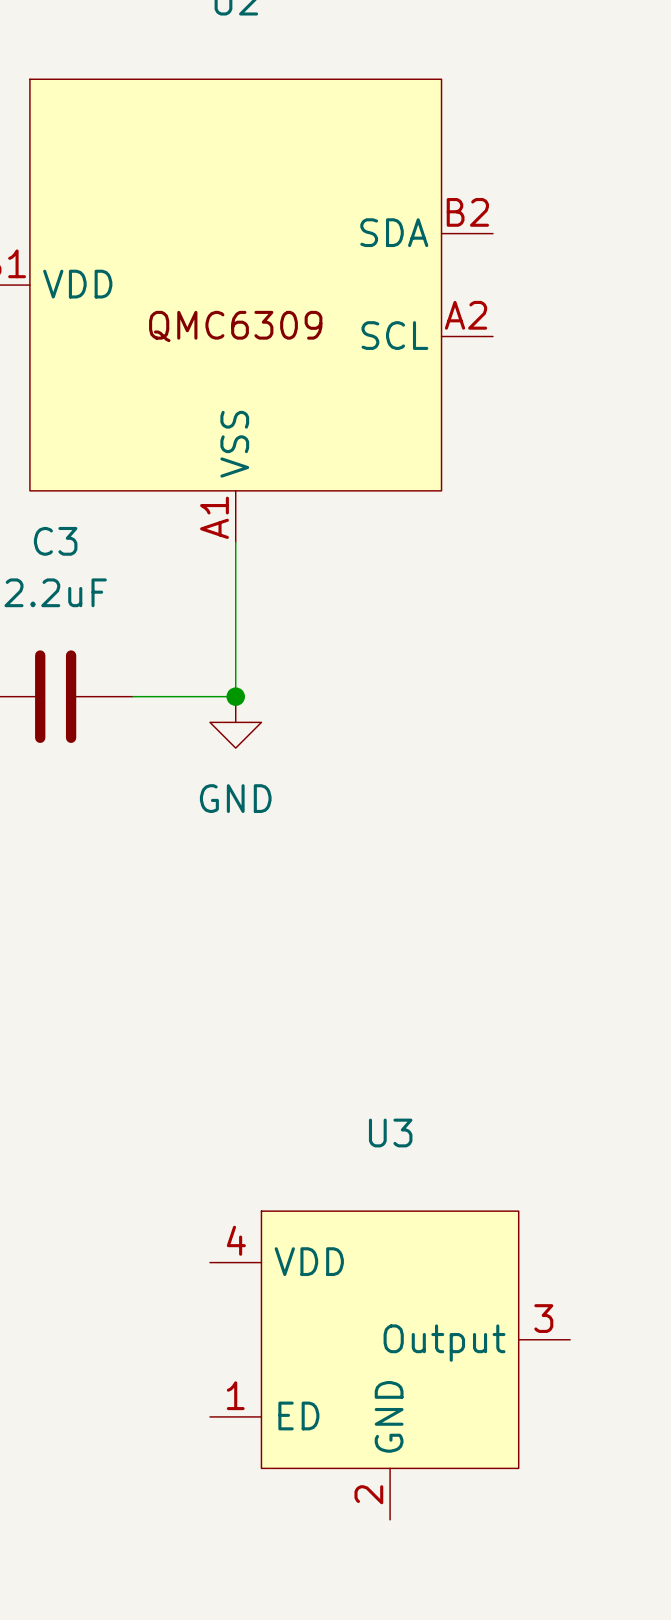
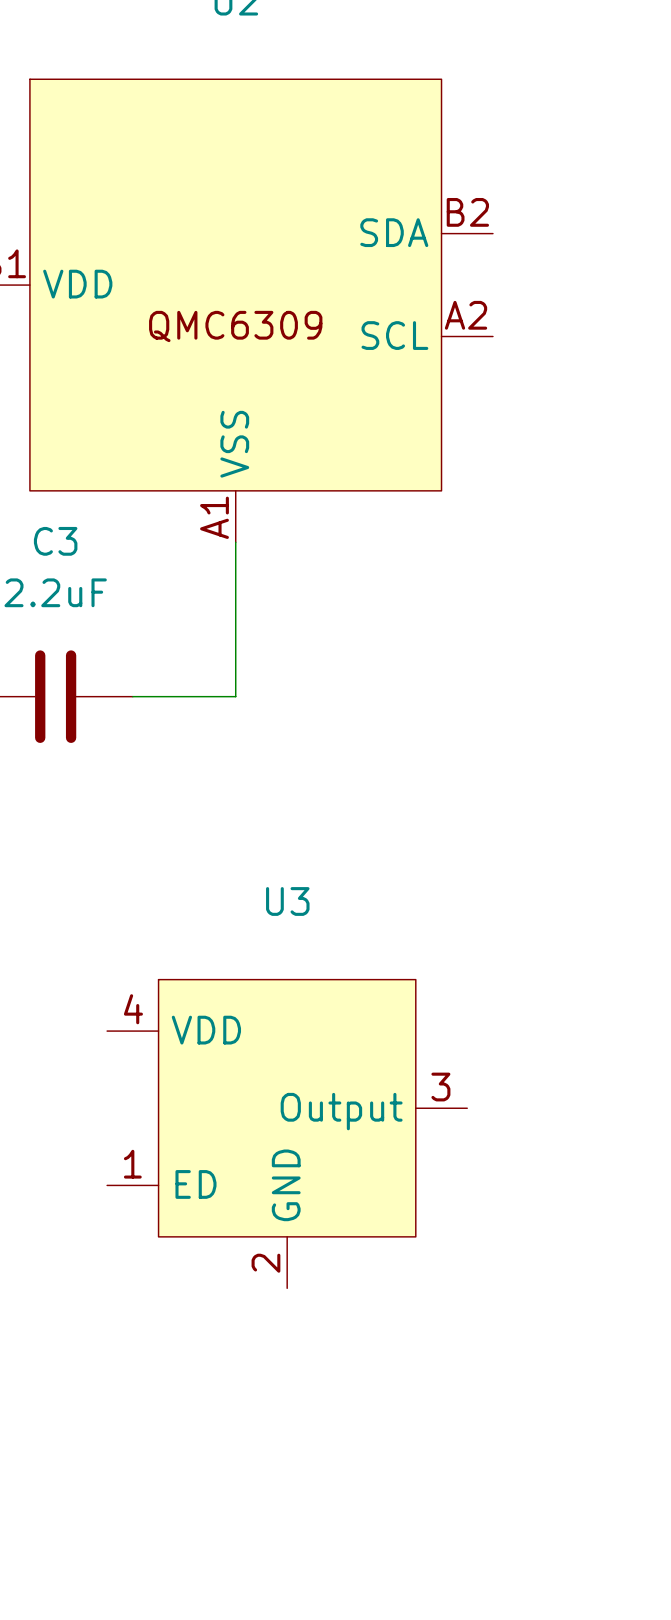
junction: (235, 696) -> none
power symbol: GND (235, 722) -> none
U3 position: (390, 1365) -> (287, 1133)

